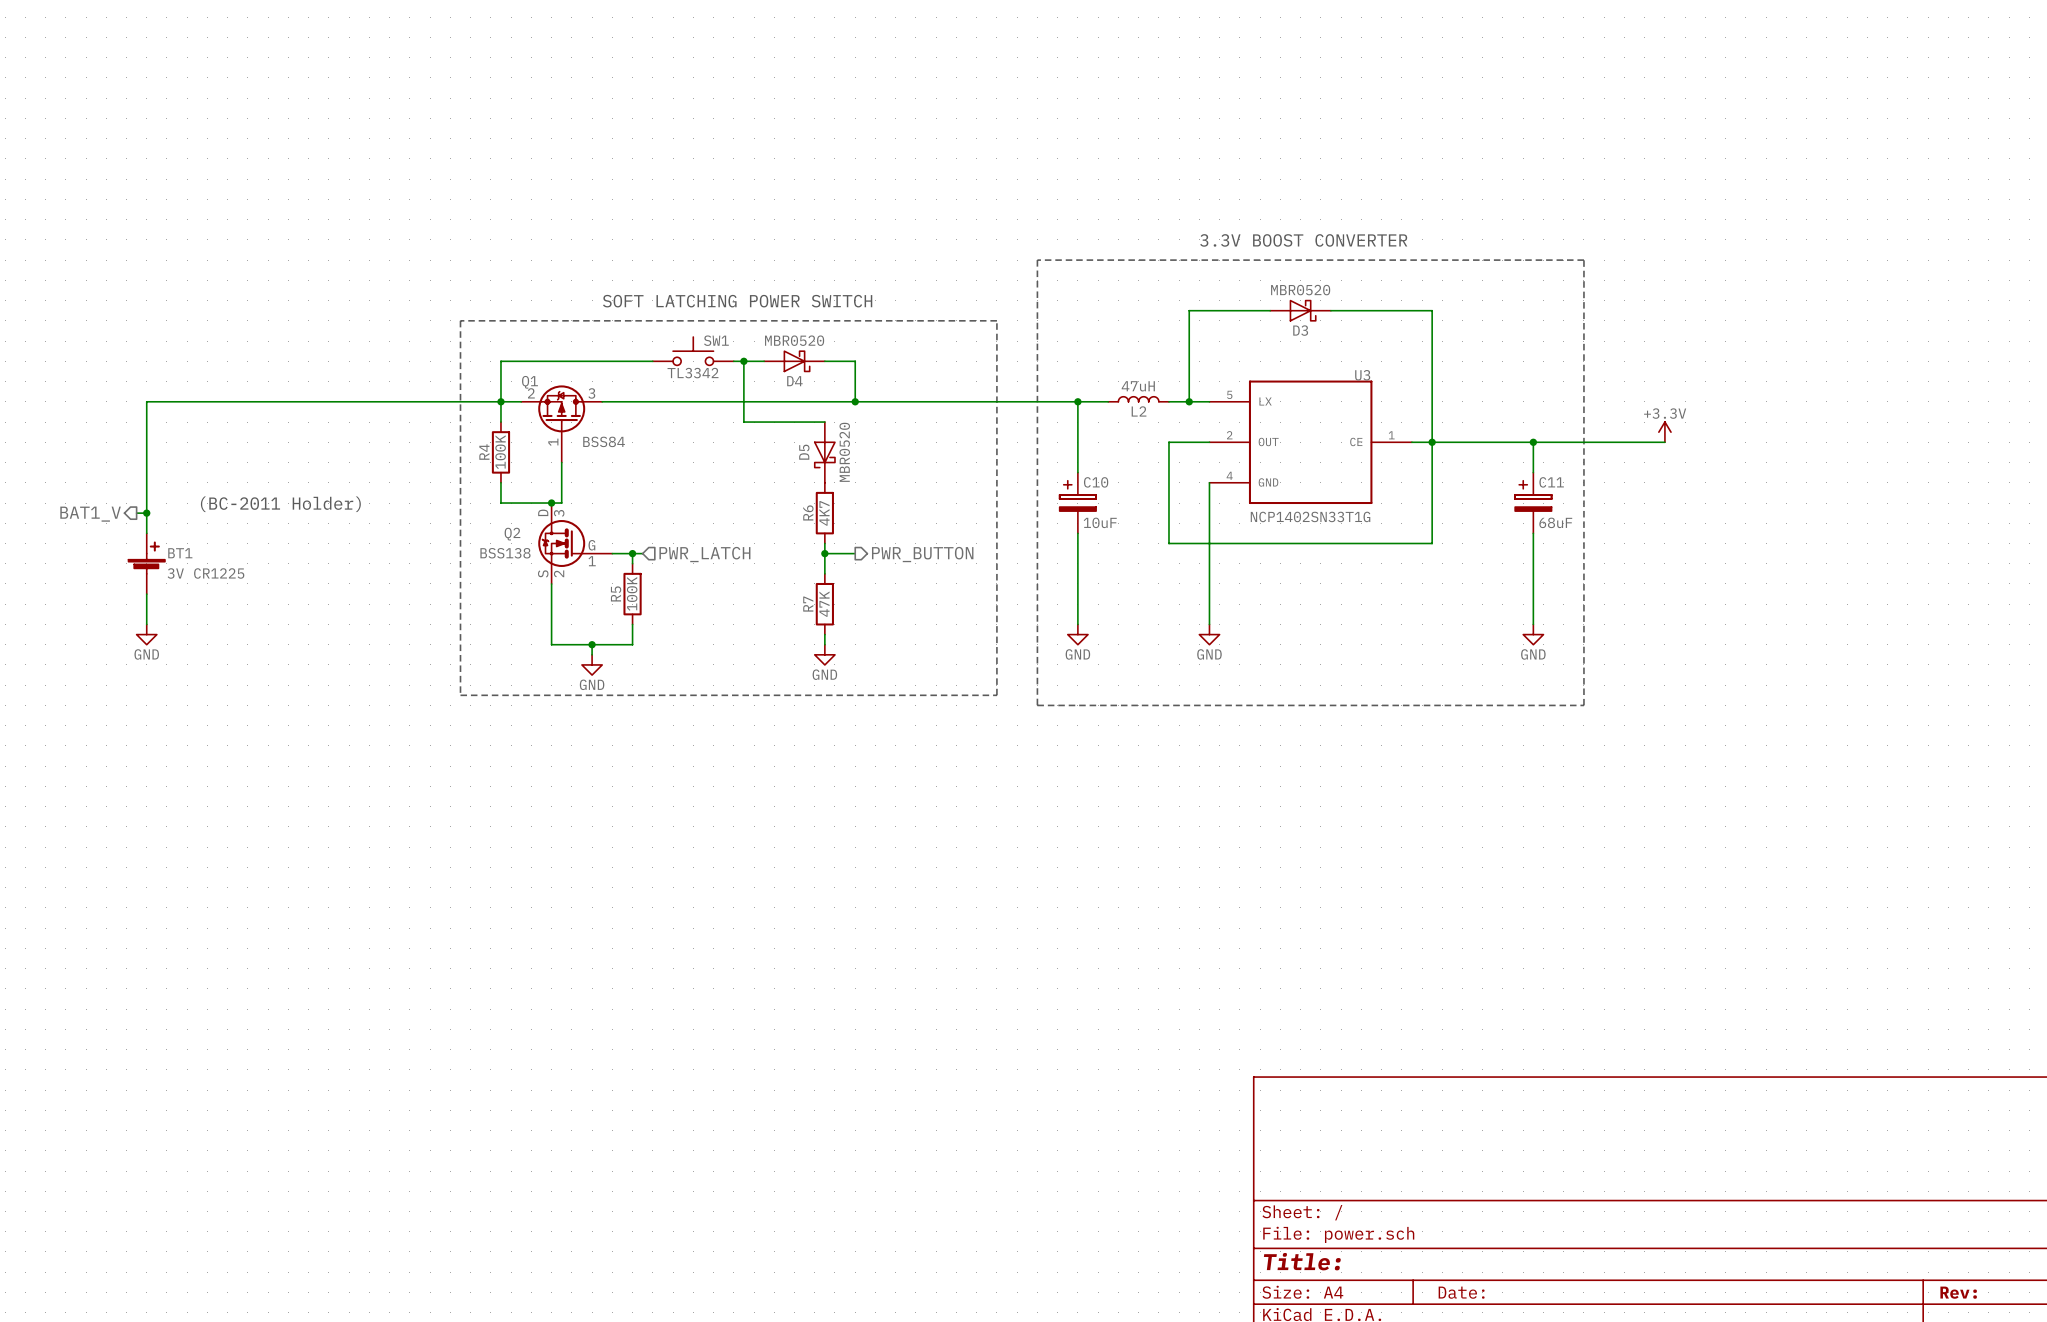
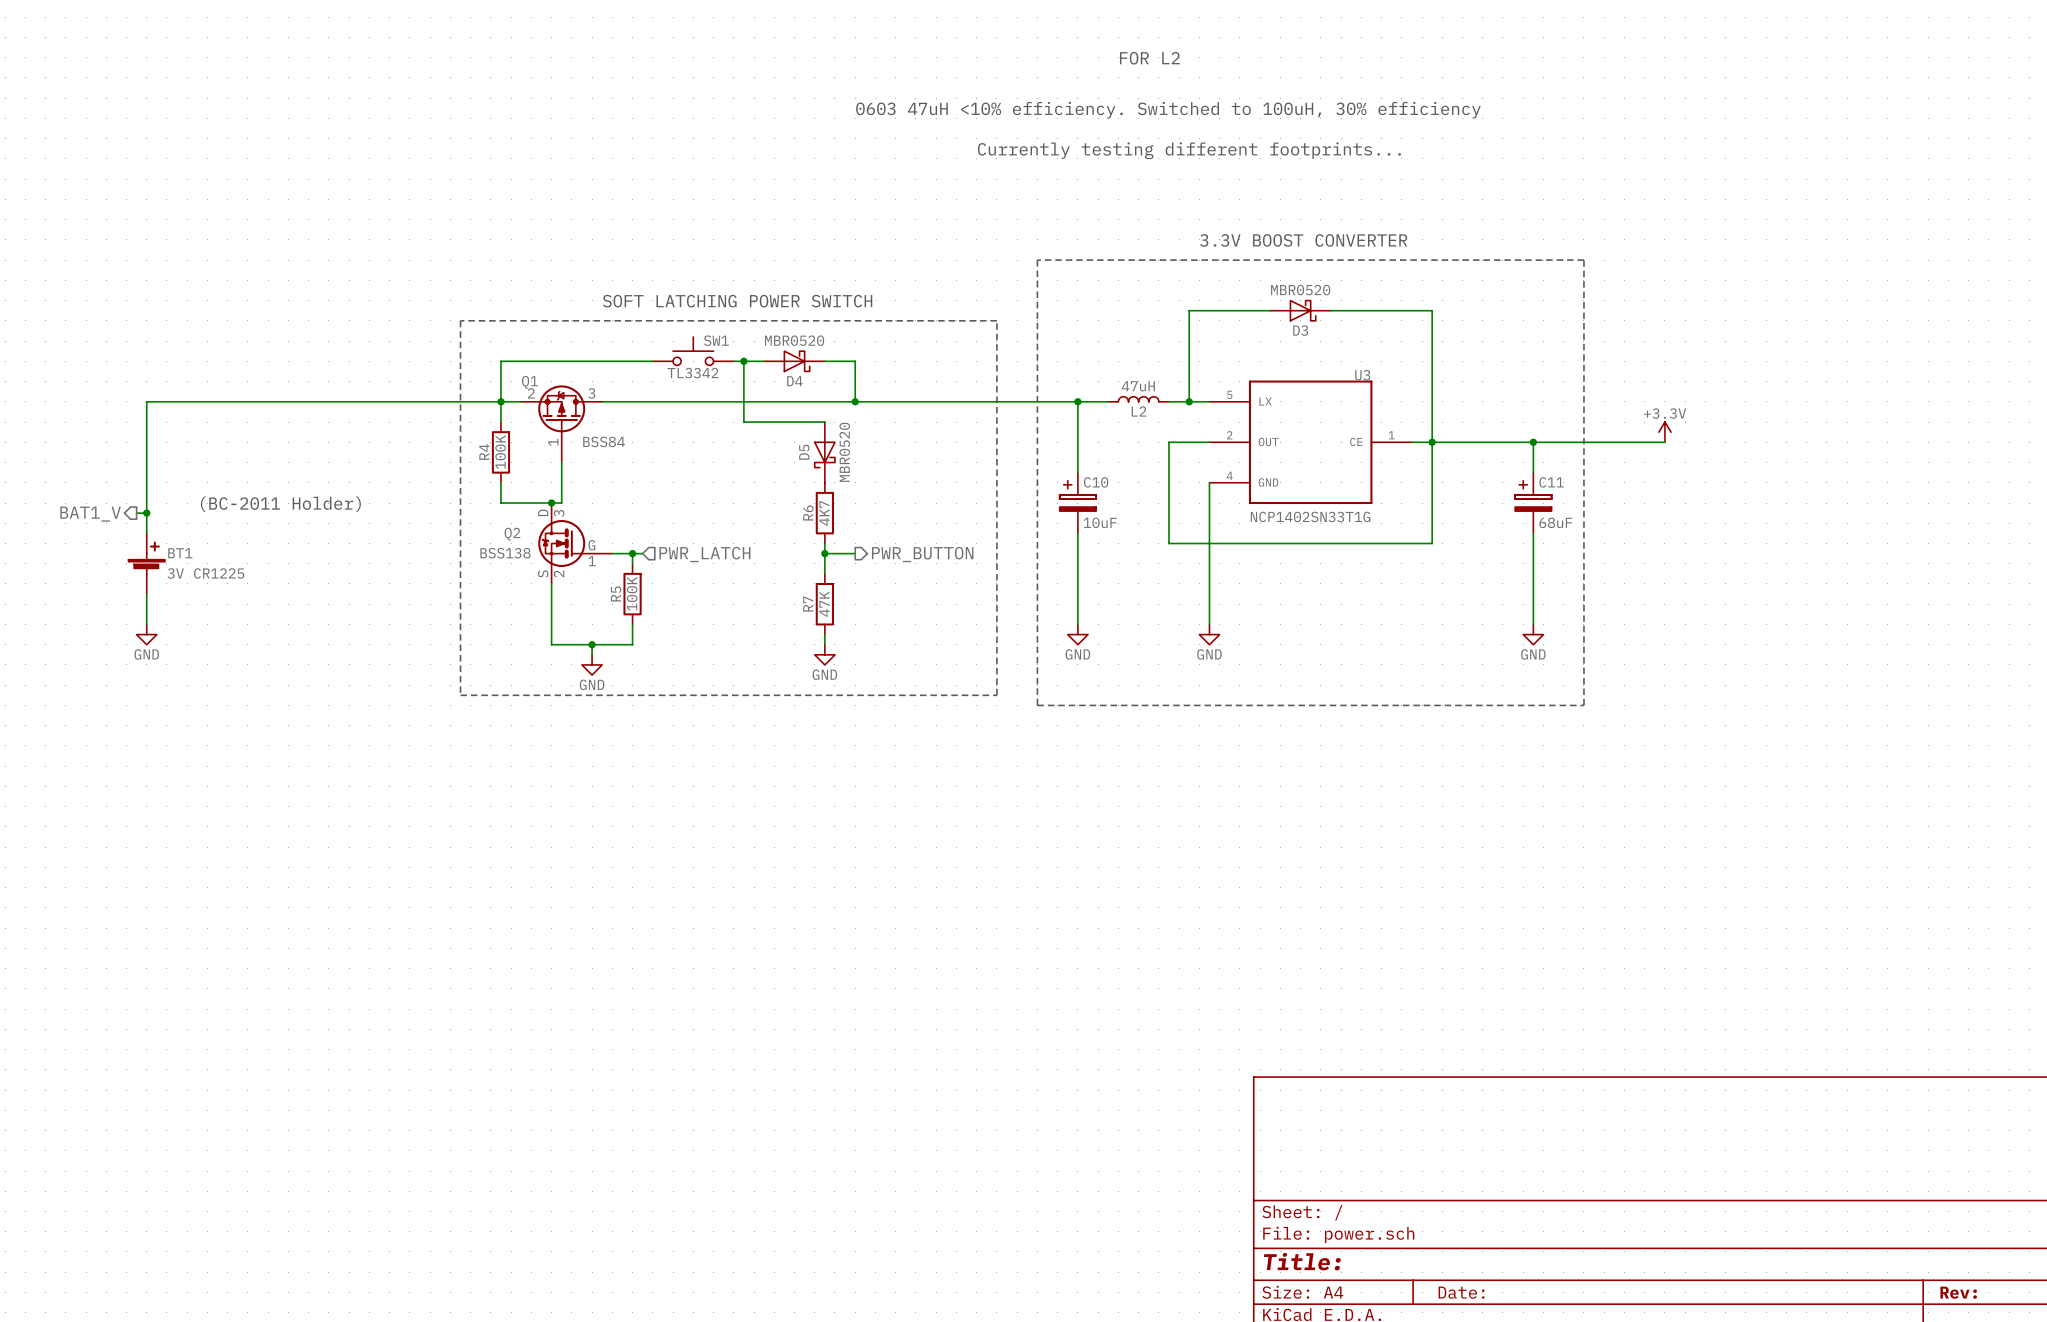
text: none -> FOR L2 (1149, 58)
text: none -> 0603 47uH <10% efficiency. Switched to 100uH, 30% efficiency (1168, 110)
text: none -> Currently testing different footprints... (1189, 150)

